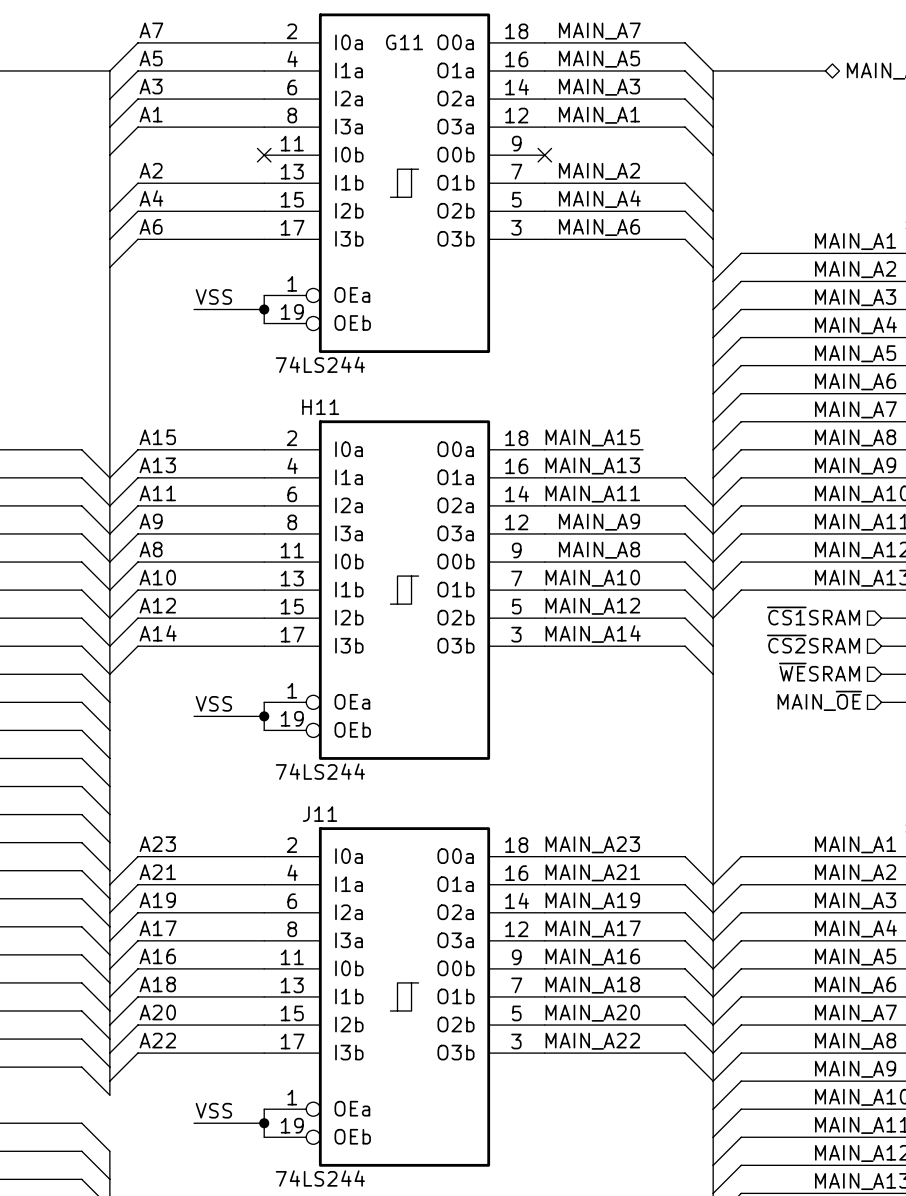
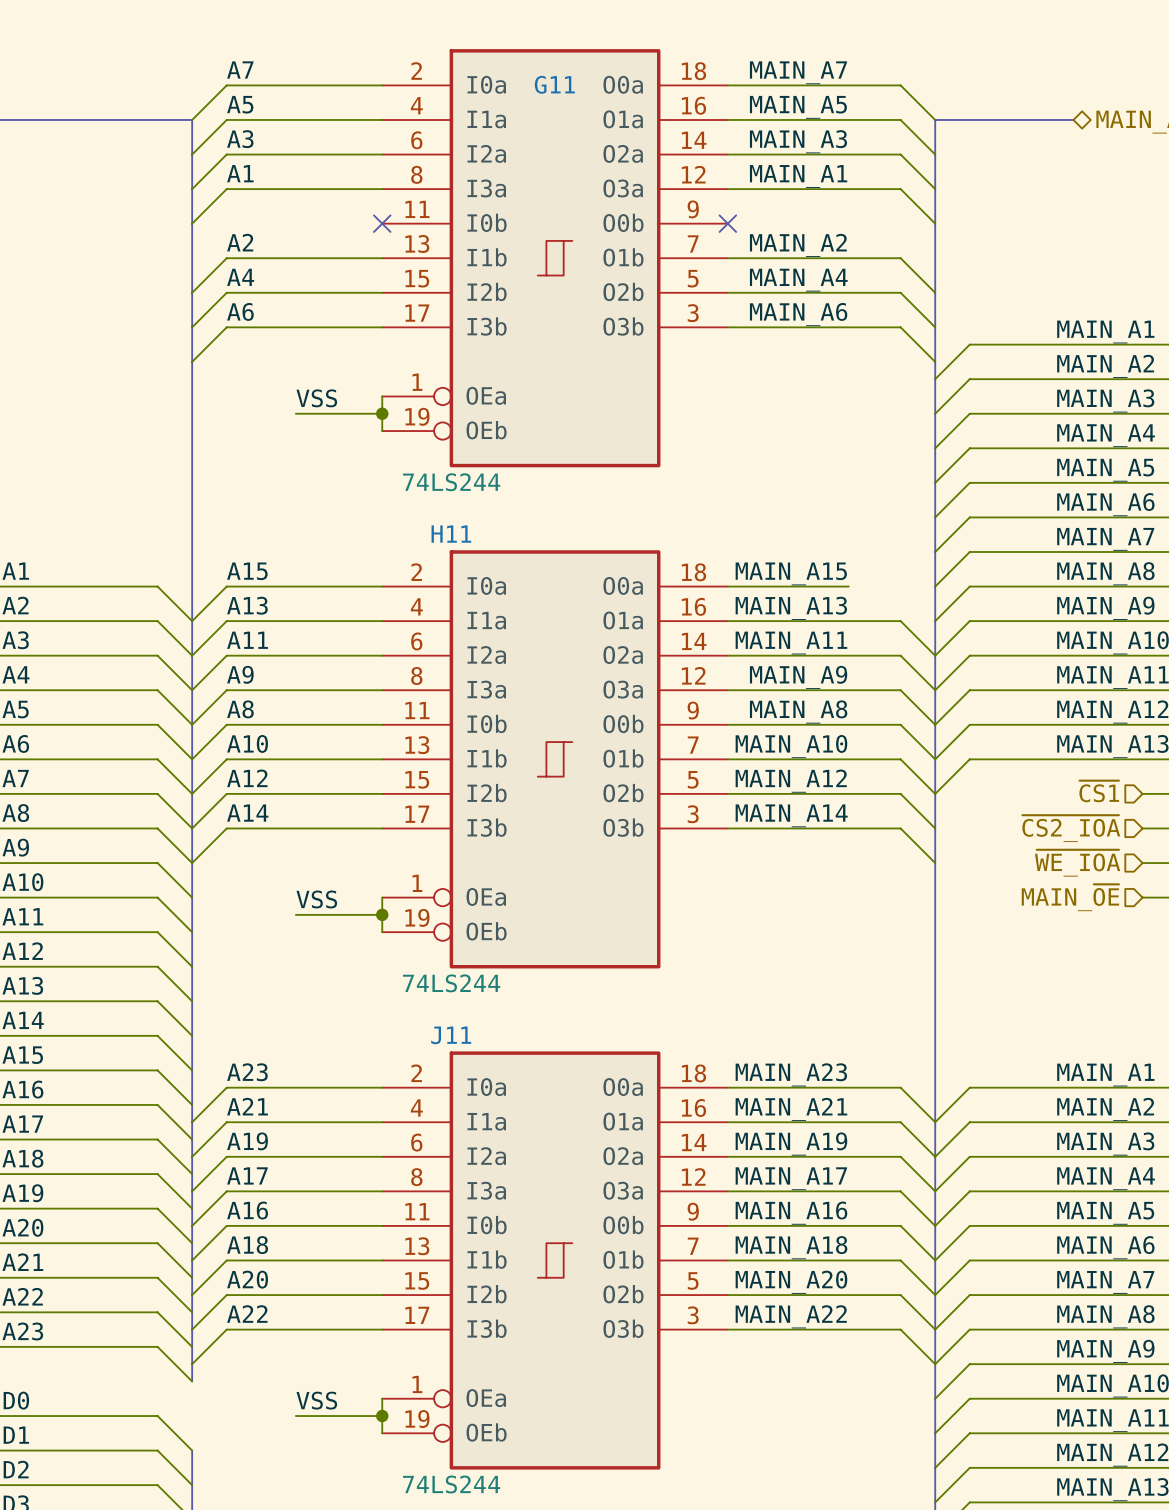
hierarchical label: ~{CS1}SRAM (813, 616) -> ~{CS1} (1099, 791)
hierarchical label: ~{CS2}SRAM (813, 644) -> ~{CS2_IOA} (1071, 828)
hierarchical label: ~{WE}SRAM (819, 672) -> ~{WE_IOA} (1077, 863)

